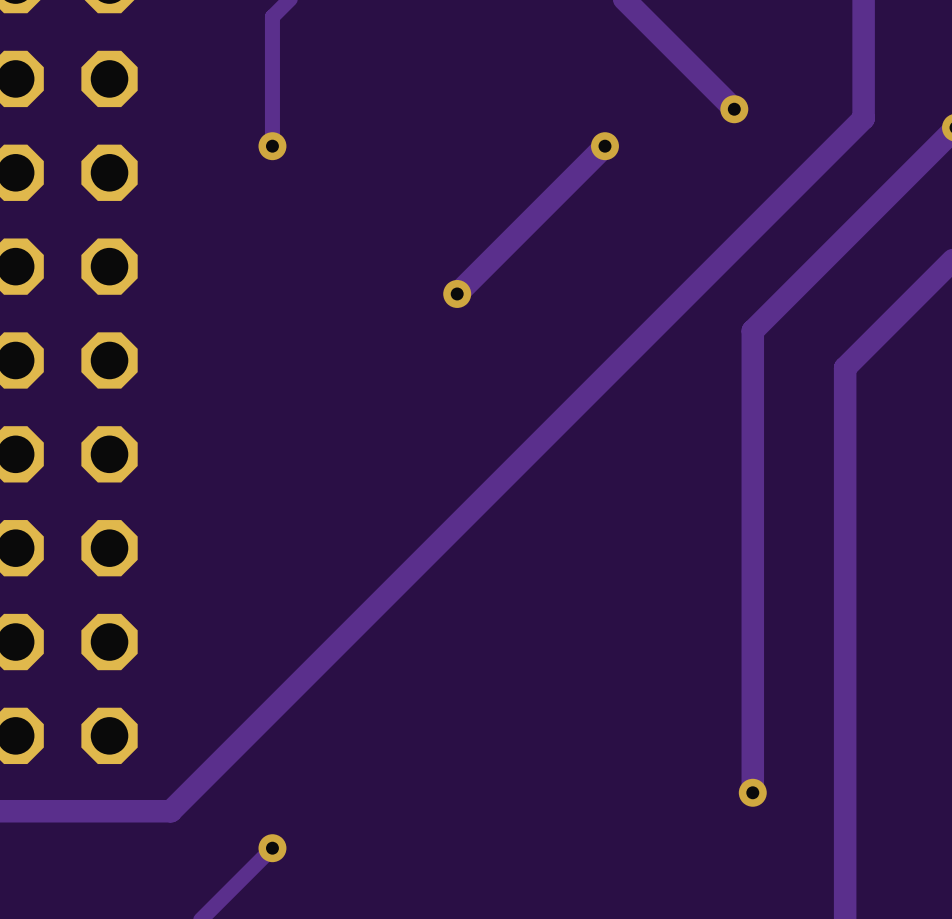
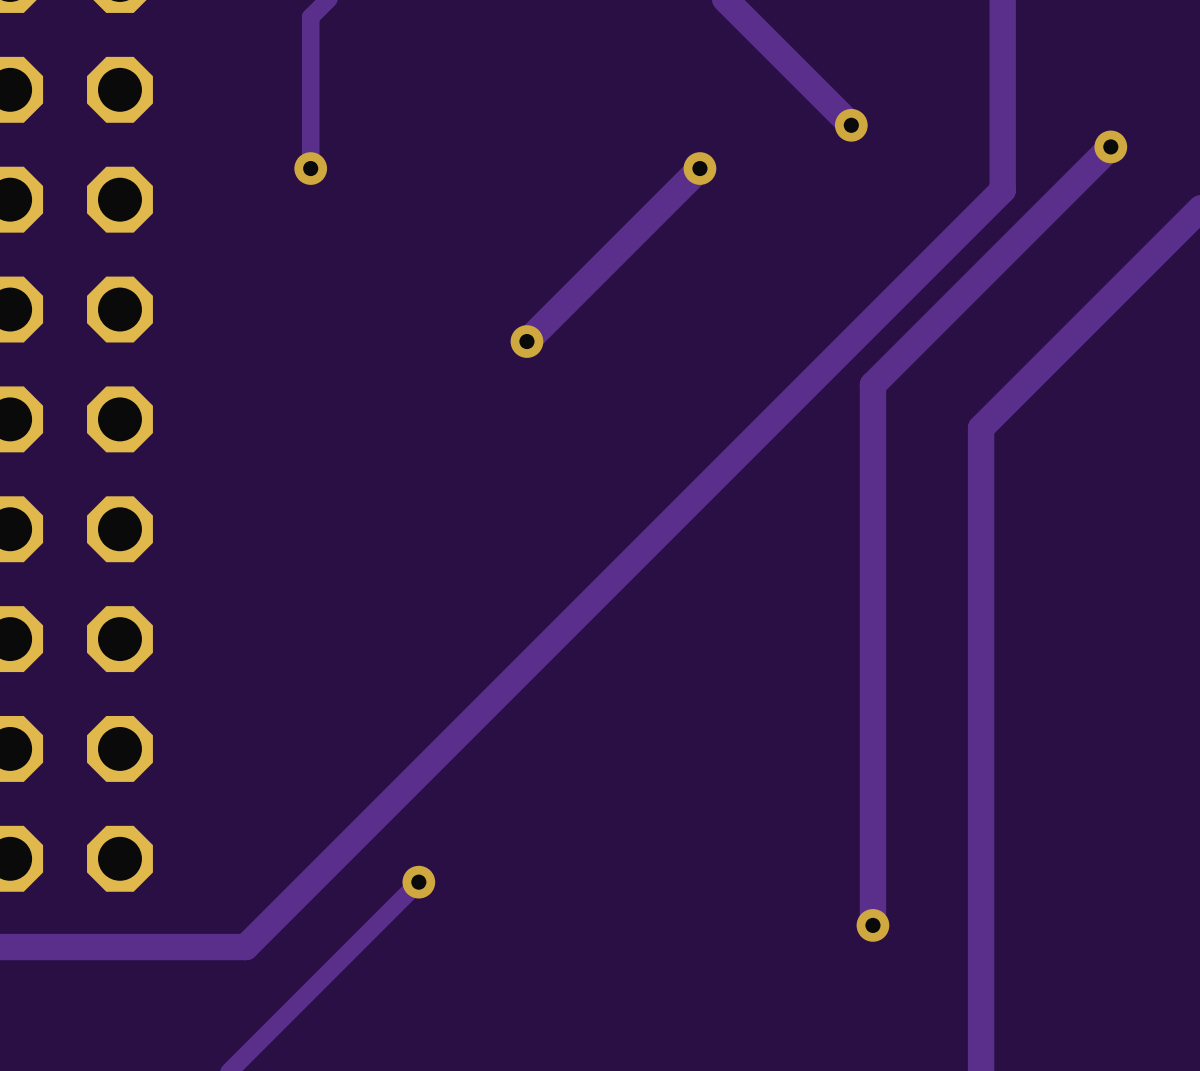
track: (863, 118) (170, 811) -> (1002, 136) (1002, 190) (245, 947) (191, 947)
track: none -> (418, 882) (310, 990)
via position: (272, 848) -> (418, 882)

